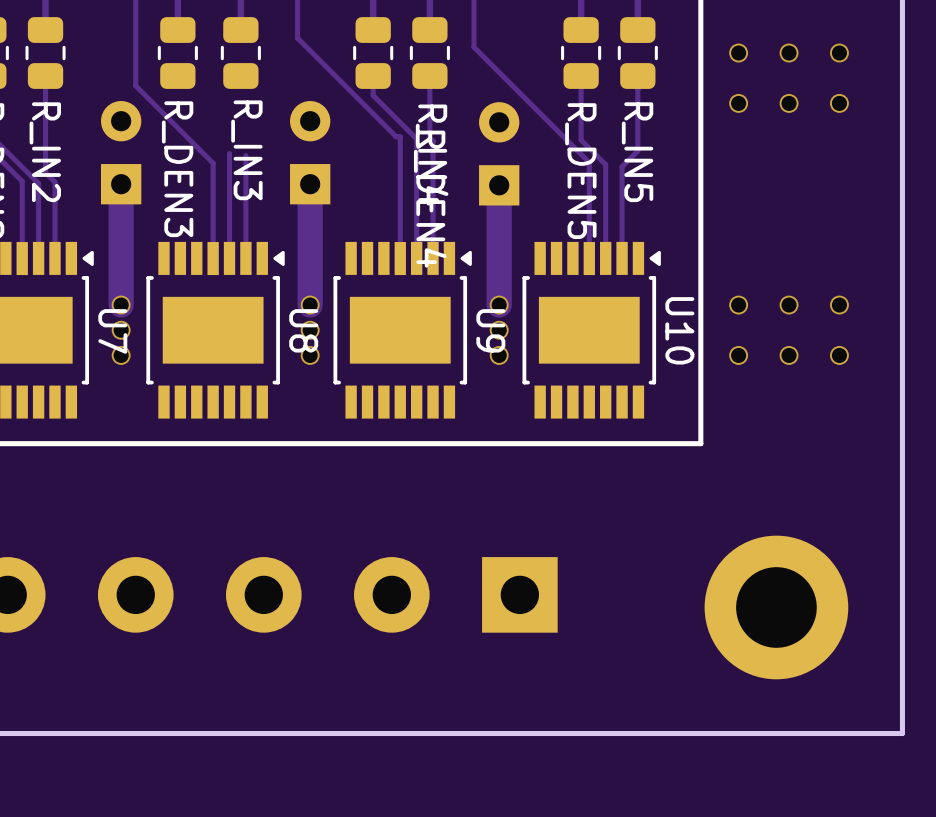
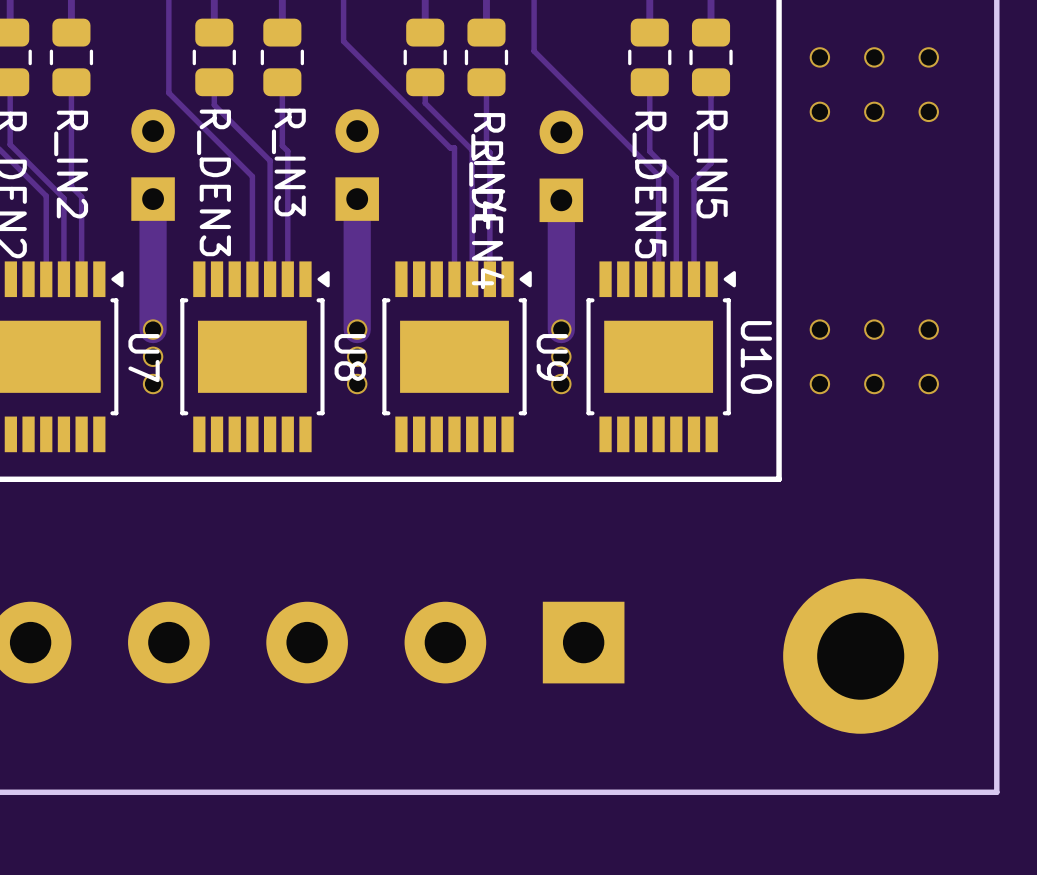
track: none -> (214, 82) (214, 105) (270, 160) (270, 165)
track: none -> (282, 82) (282, 145) (287, 151) (287, 168)

